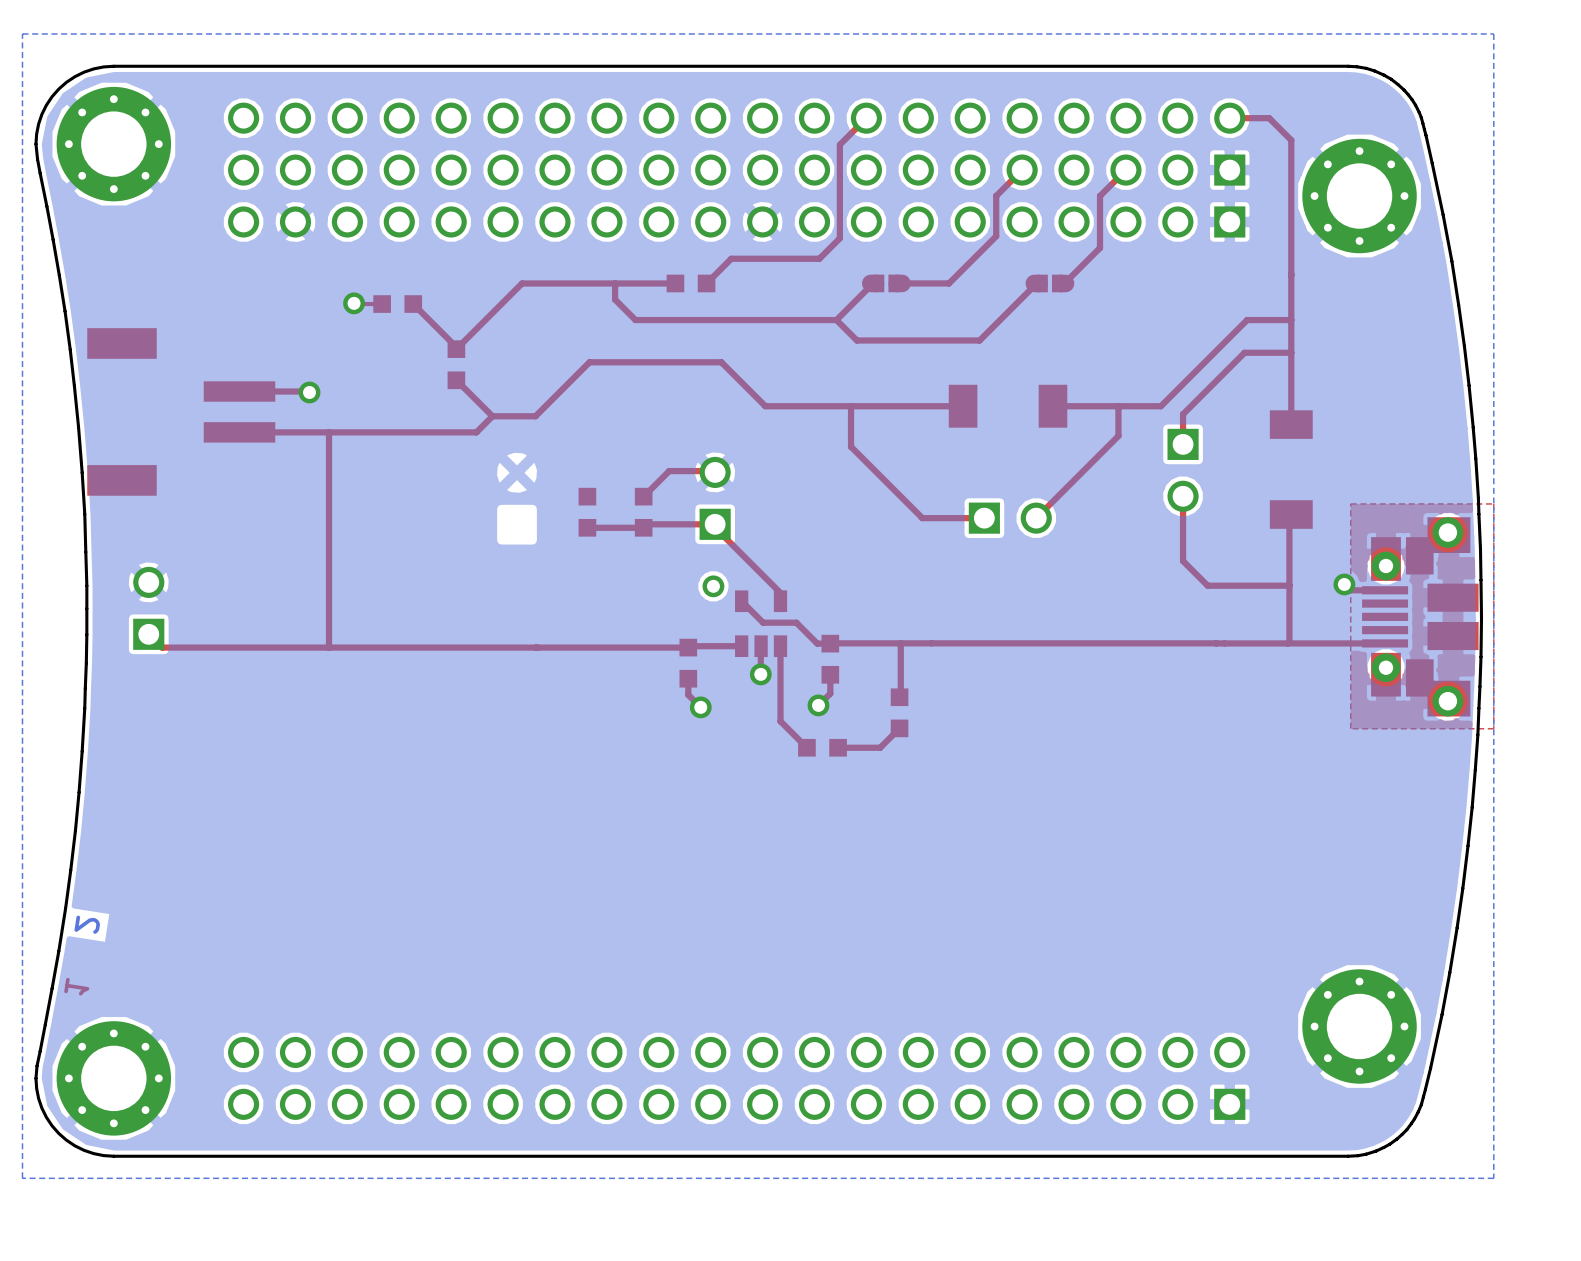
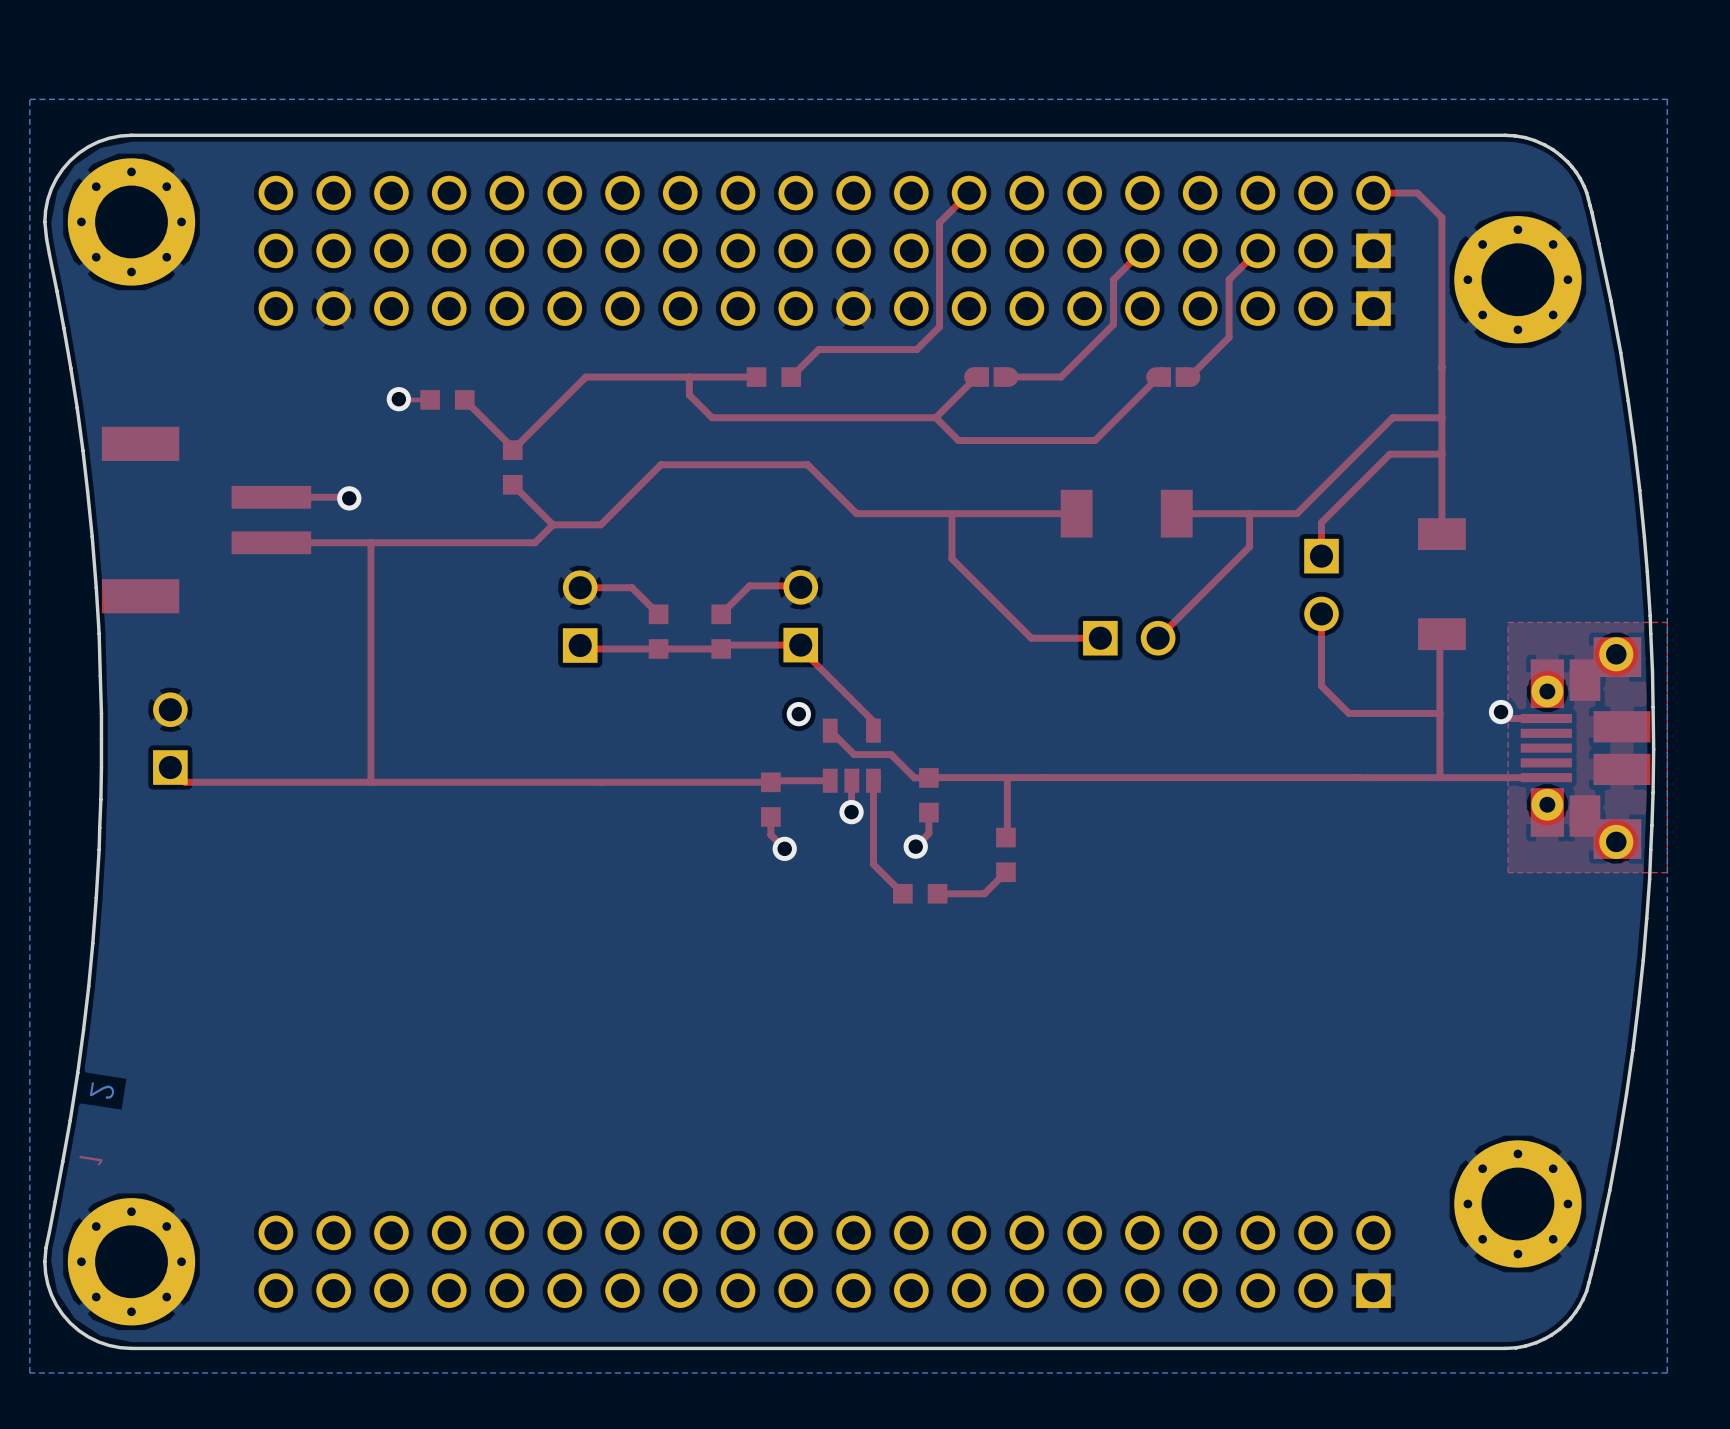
top track: none -> (580, 587) (631, 587) (658, 614)
part: none -> (580, 616)
top track: none -> (580, 645) (583, 648) (658, 648)

